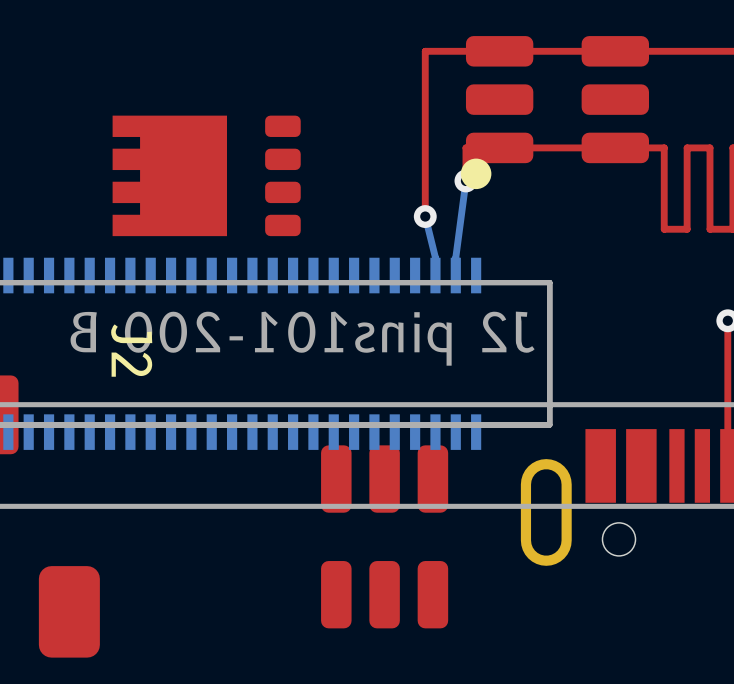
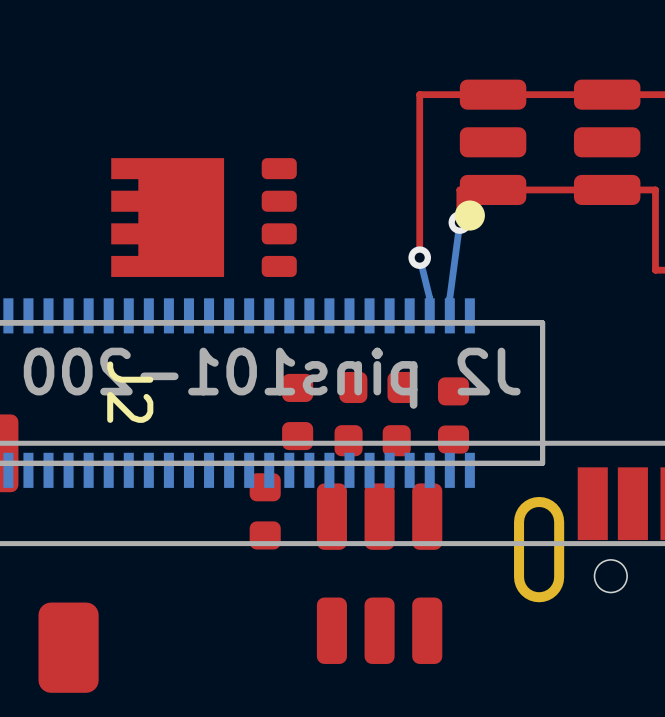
part: none -> (377, 387)
part: none -> (297, 412)
part: none -> (453, 415)
part: none -> (372, 440)
part: none -> (265, 511)

